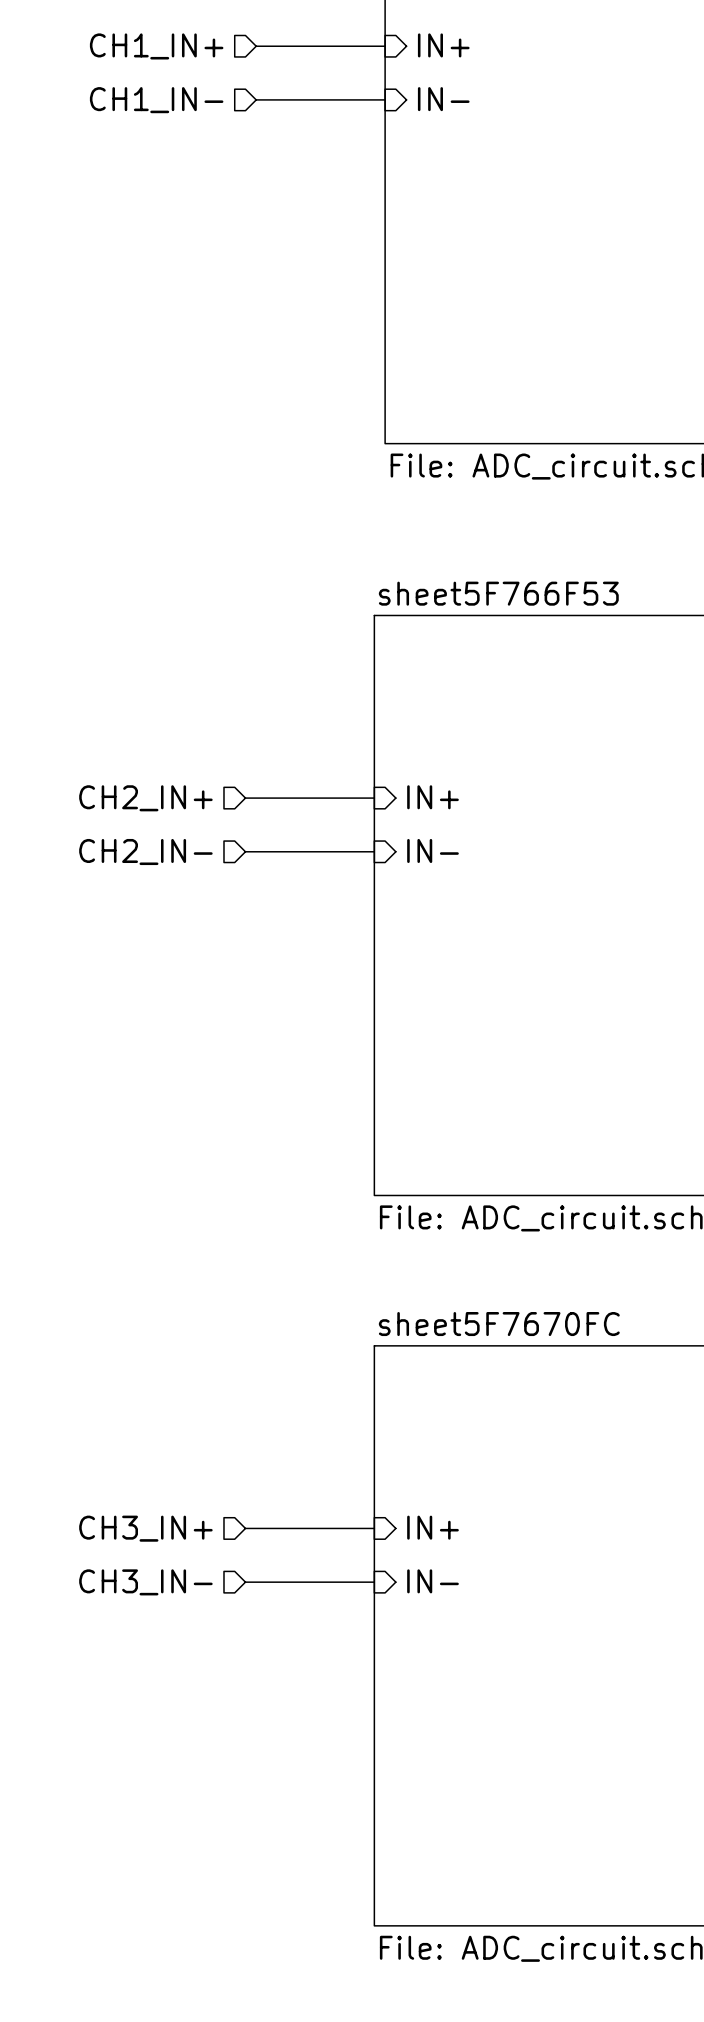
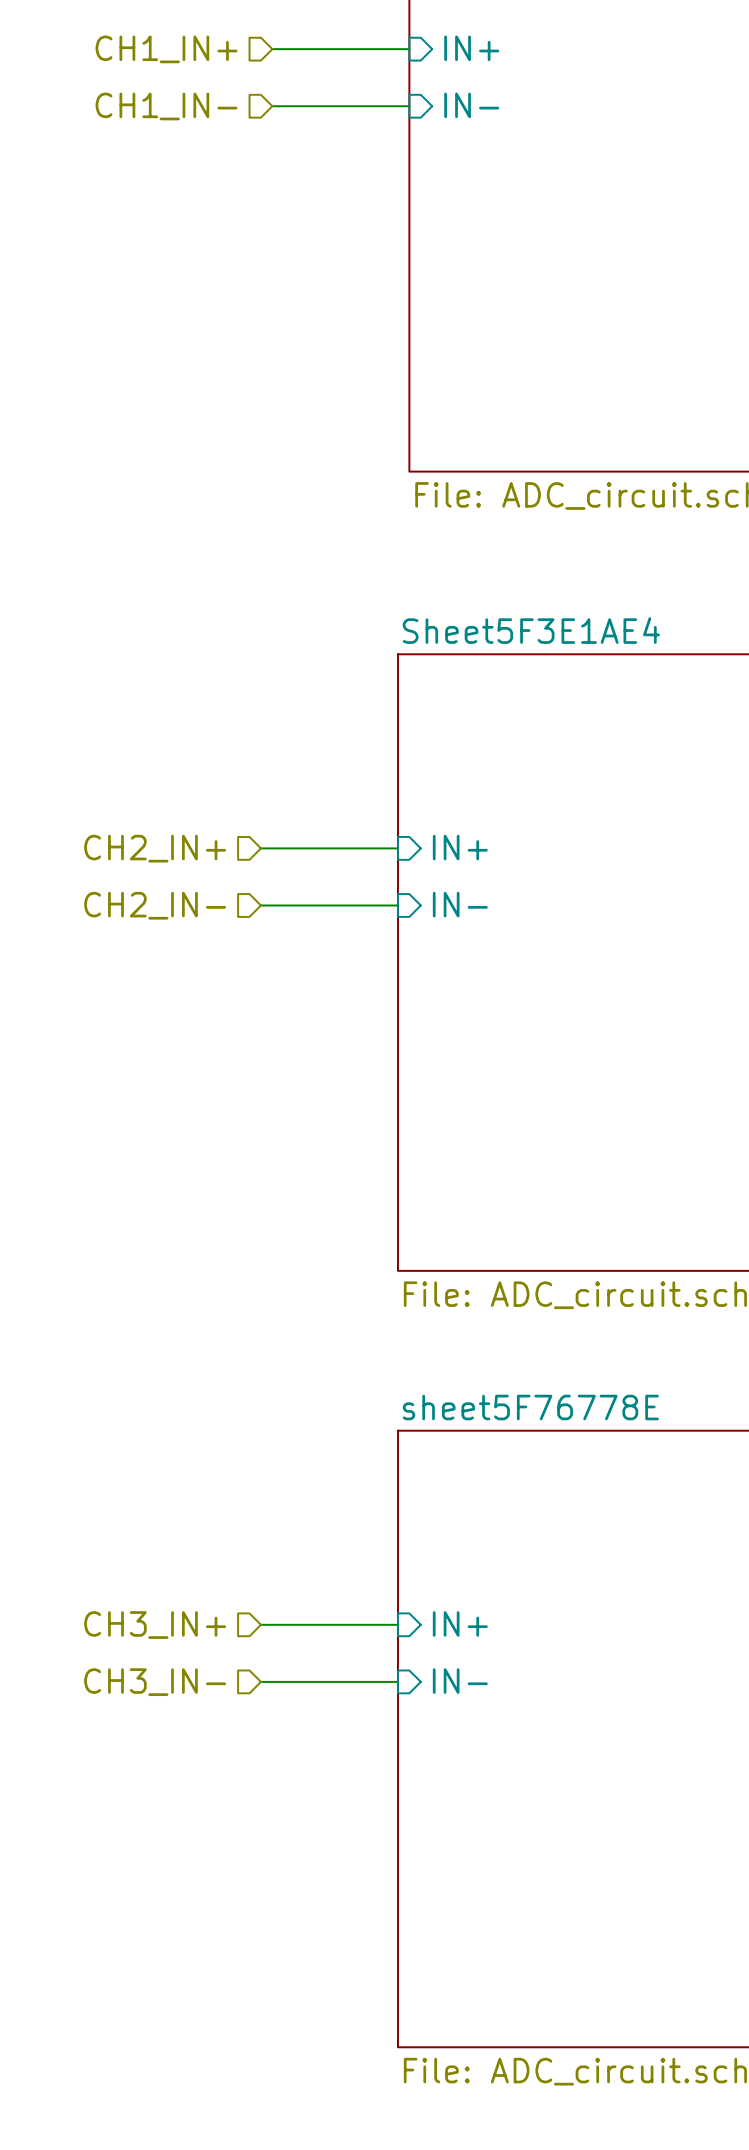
sheet sheet5F766F53 name: sheet5F766F53 (498, 593) -> Sheet5F3E1AE4 (531, 630)
sheet sheet5F7670FC name: sheet5F7670FC (499, 1324) -> sheet5F76778E (530, 1407)

